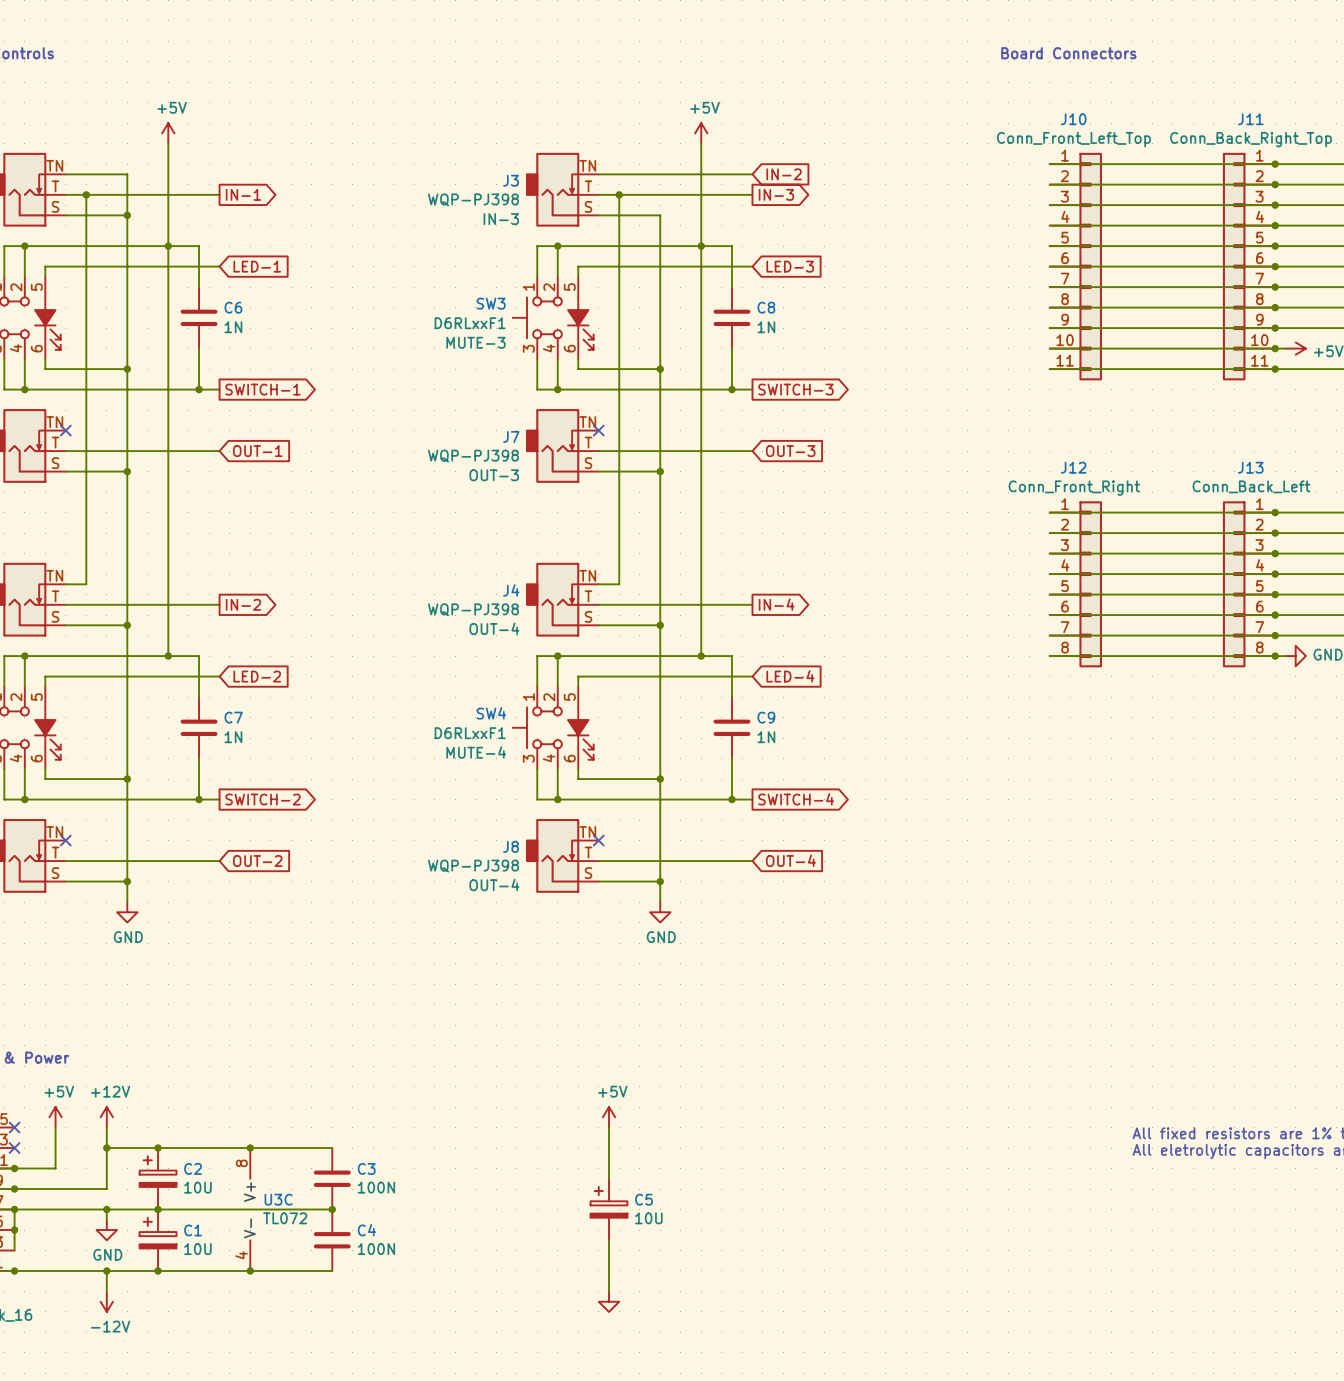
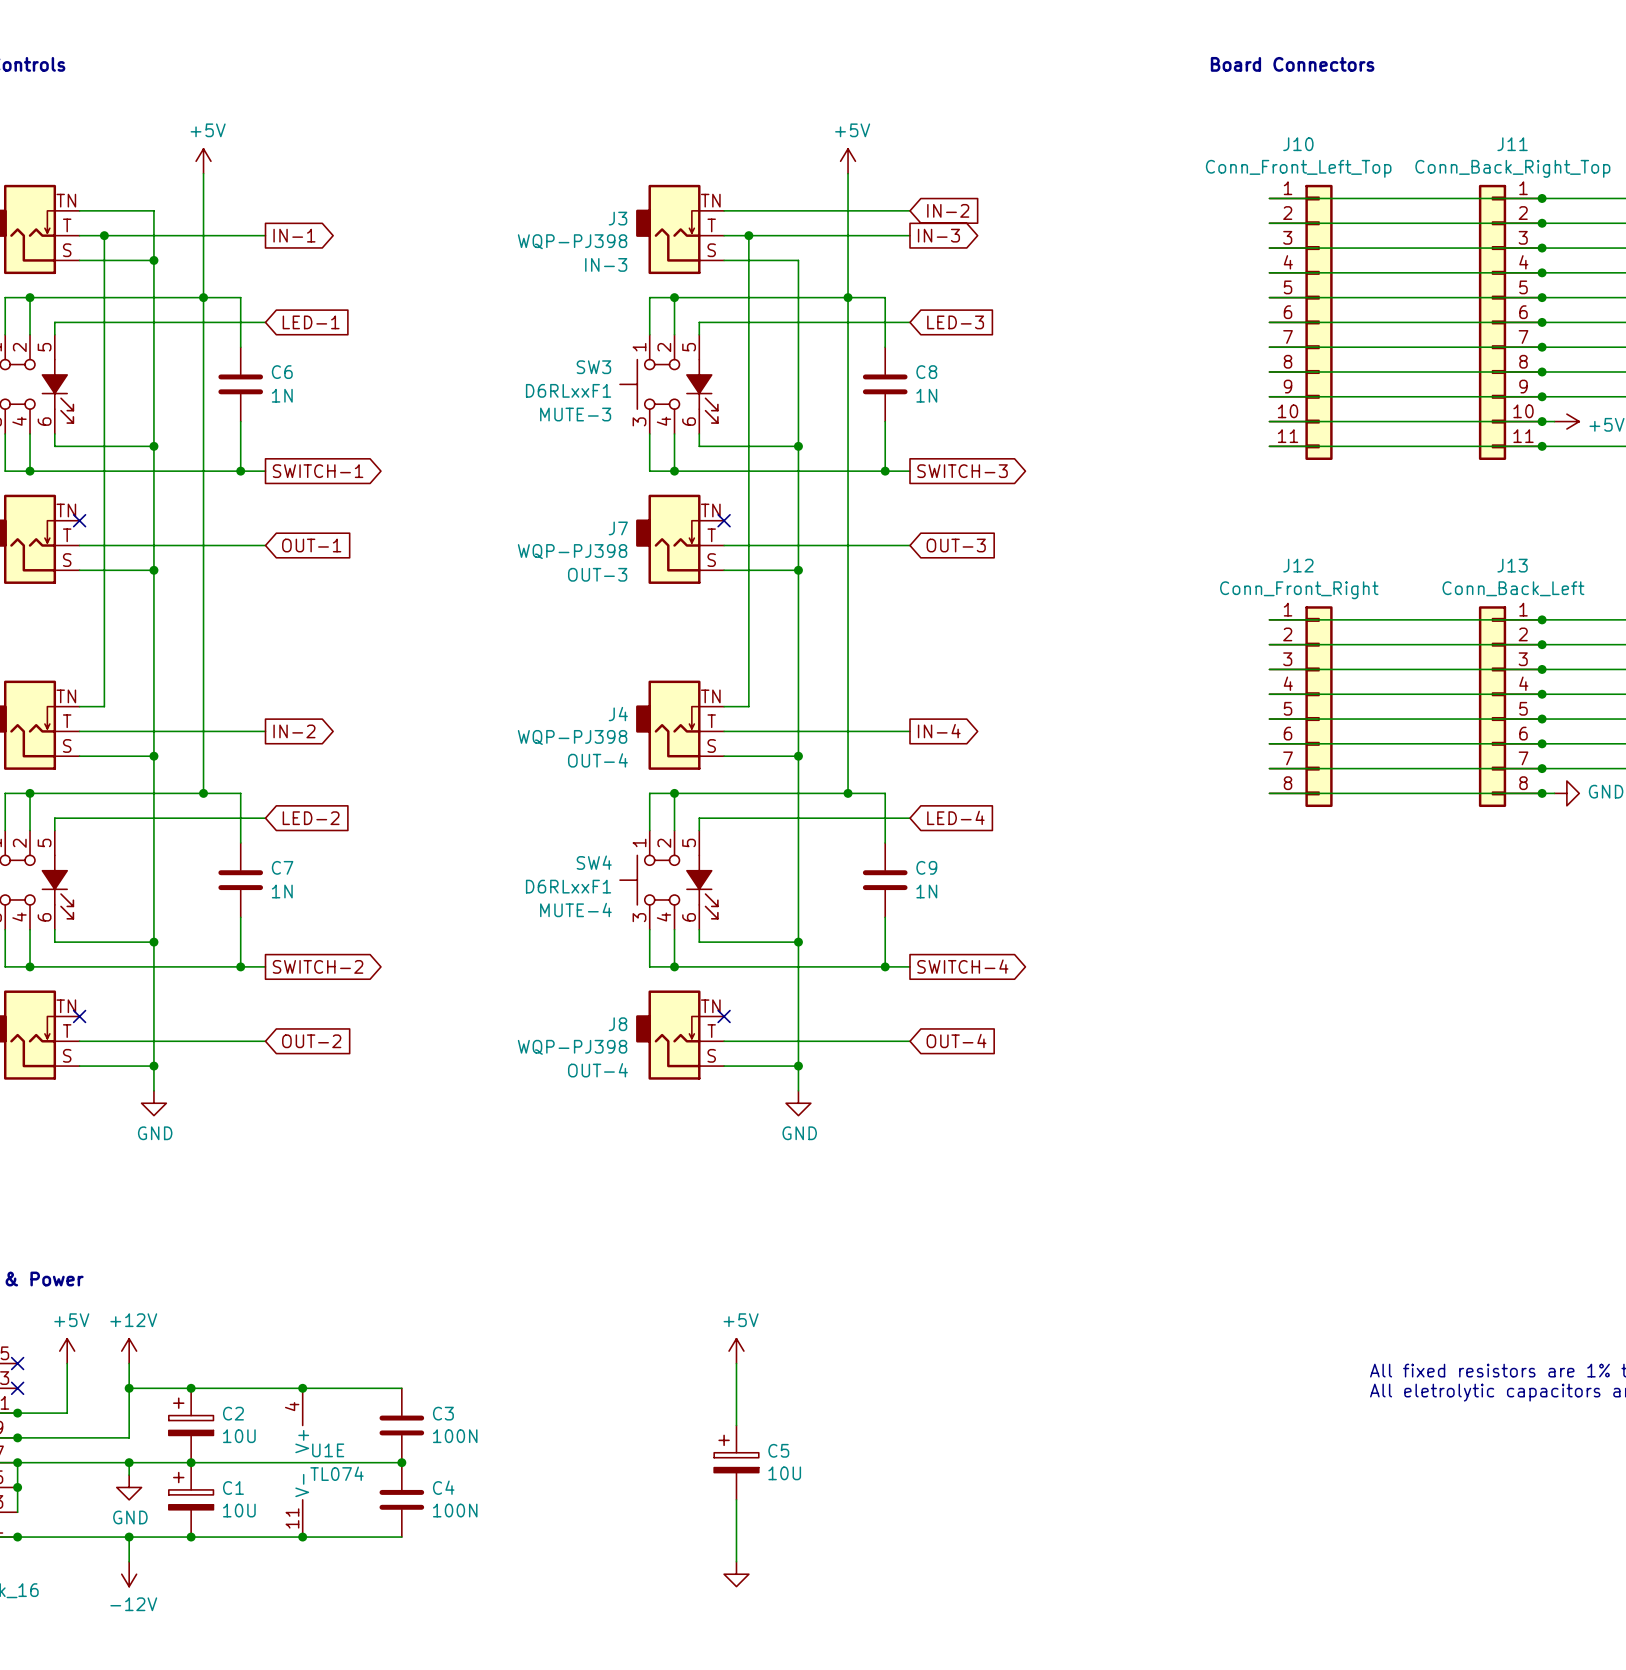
U3C pin number: 8 (241, 1163) -> 4 (292, 1406)
U3C name: U3C (278, 1199) -> U1E (328, 1450)
U3C value: TL072 (285, 1218) -> TL074 (337, 1473)
U3C pin number: 4 (241, 1255) -> 11 (292, 1518)

